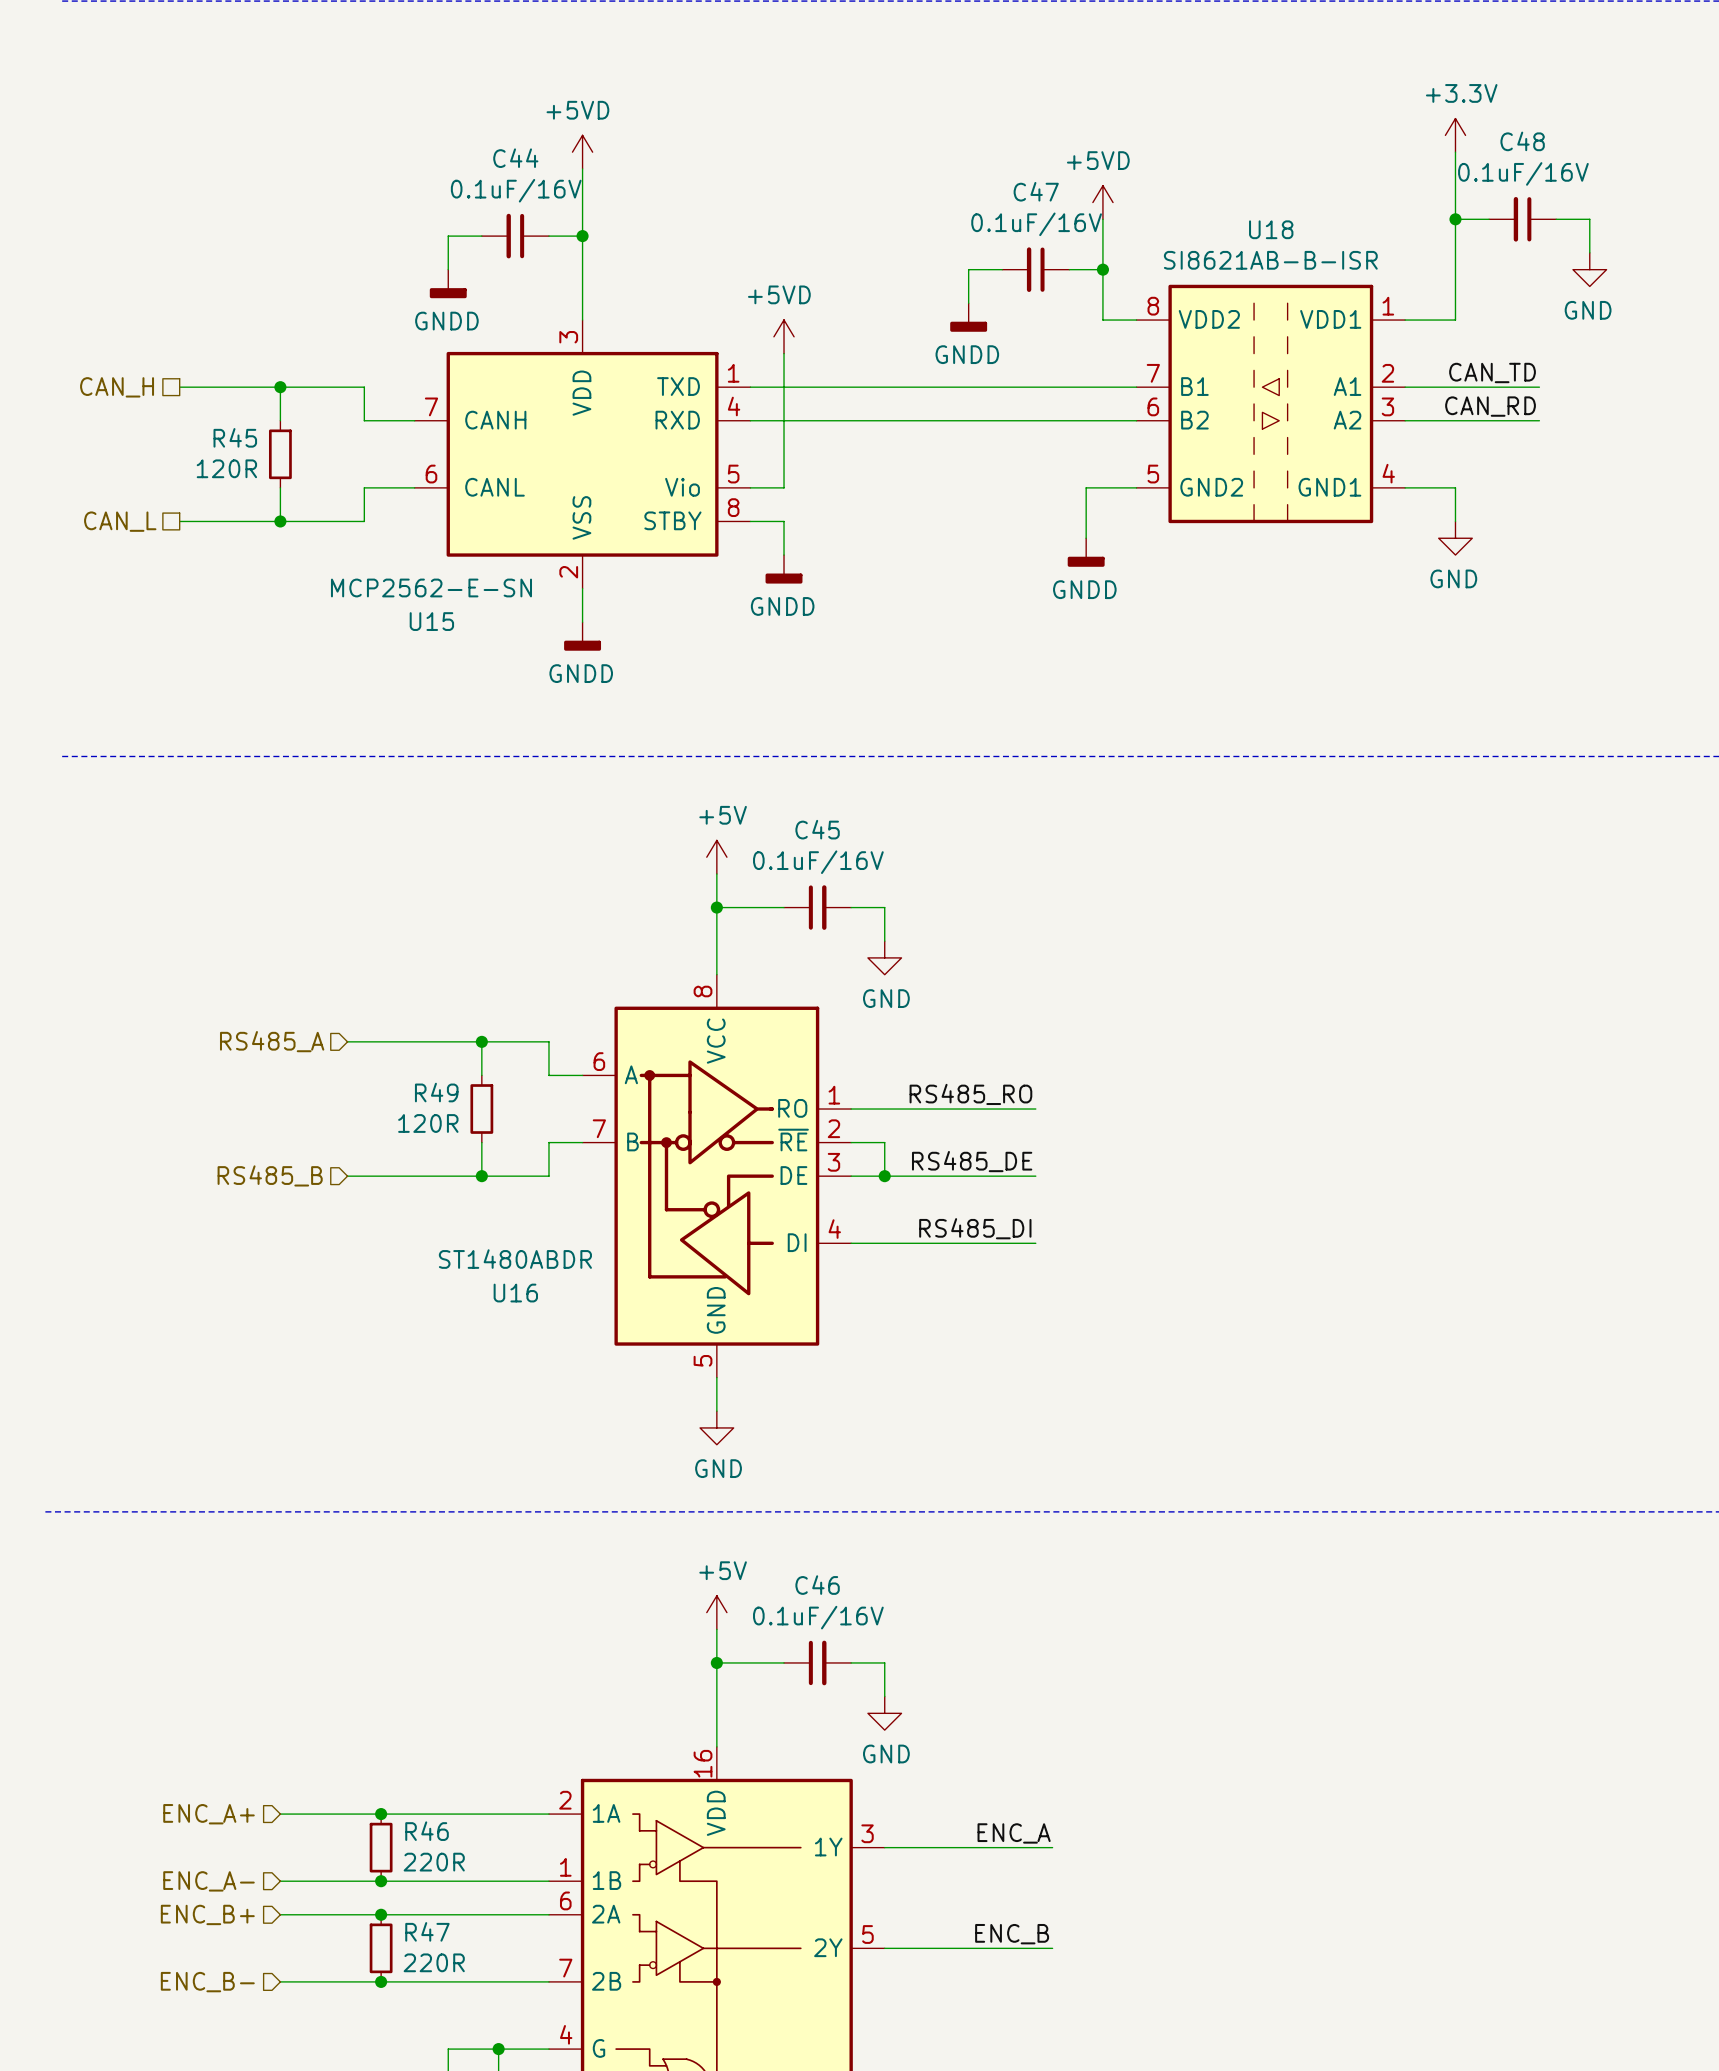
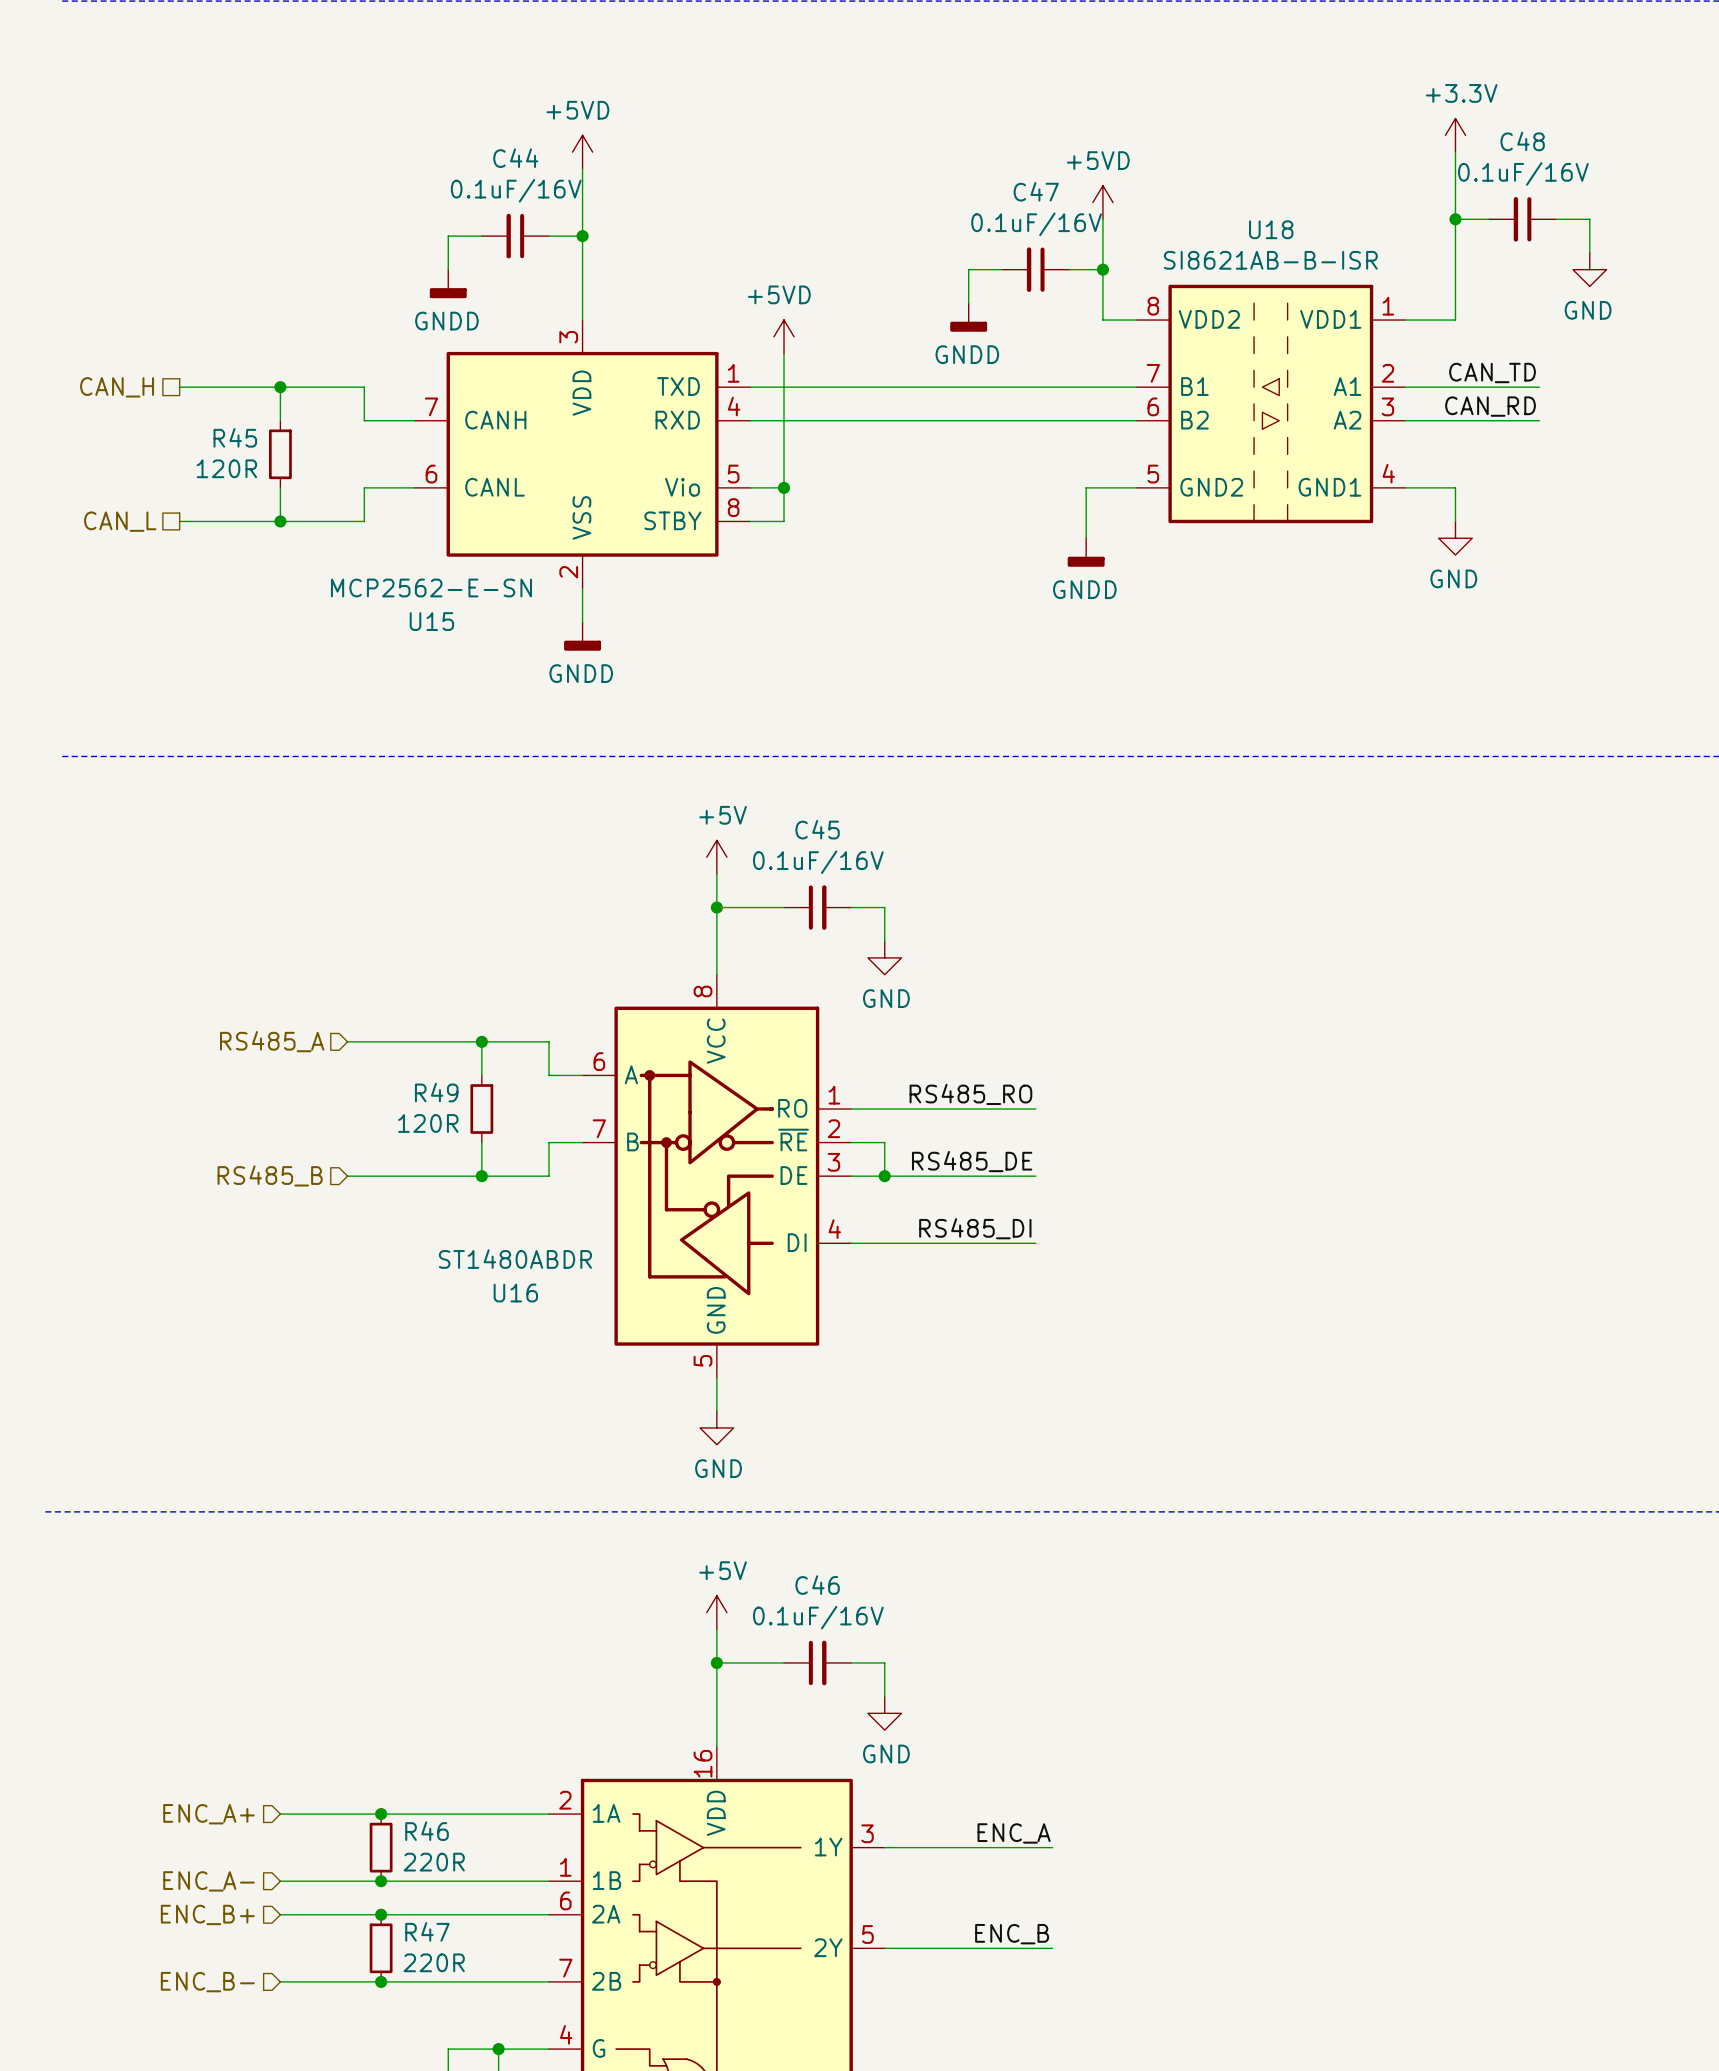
junction: none -> (784, 487)
wire: (784, 521) (784, 555) -> (784, 521) (784, 487)
power symbol: GNDD (784, 569) -> none

